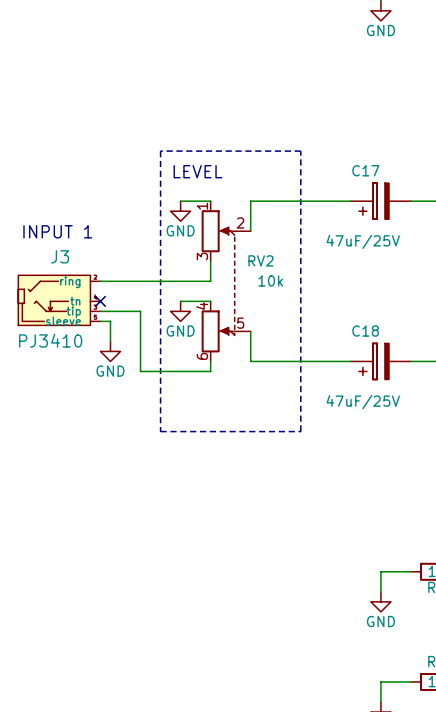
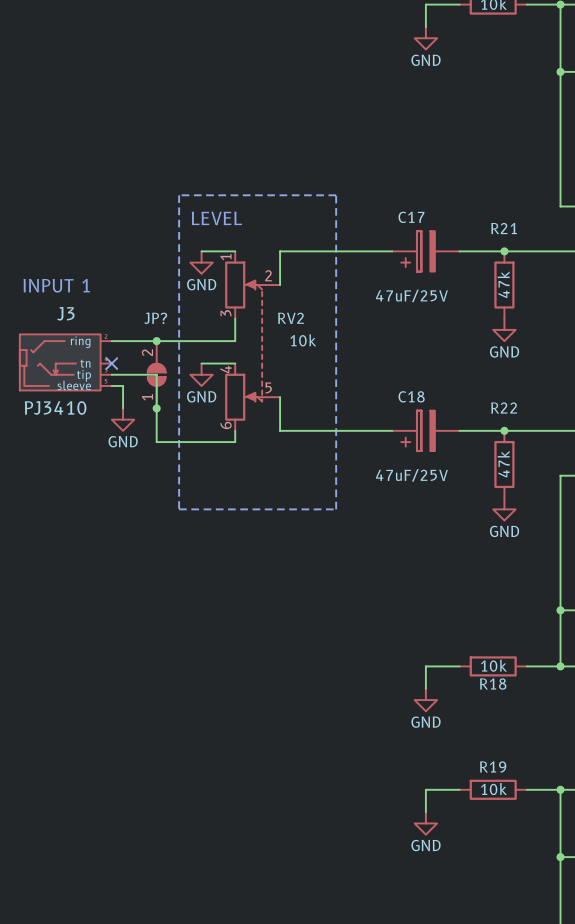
junction: none -> (156, 341)
JP?: none -> (156, 374)
junction: none -> (156, 408)

